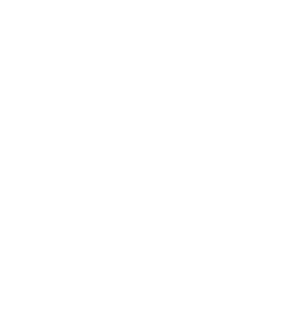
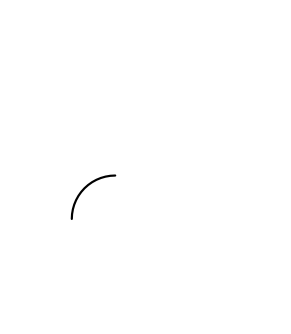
board edge: none -> (115, 175) (100, 177) (84, 188) (76, 200) (71, 218)

